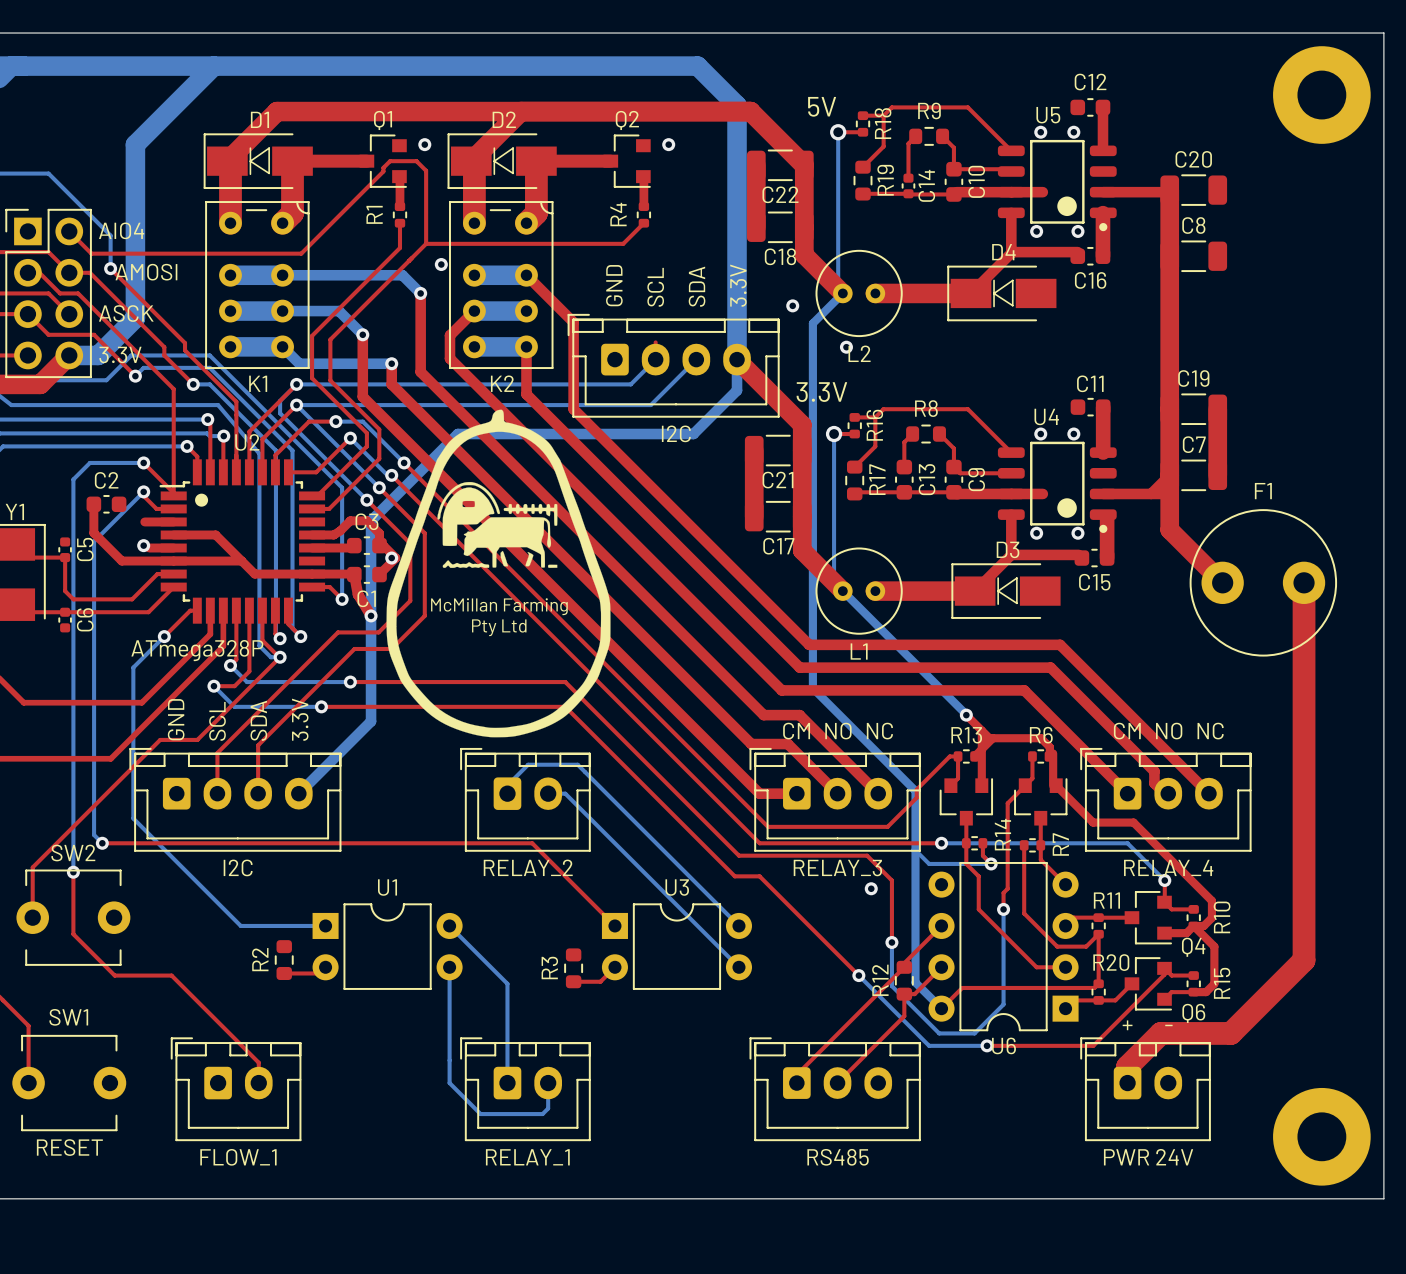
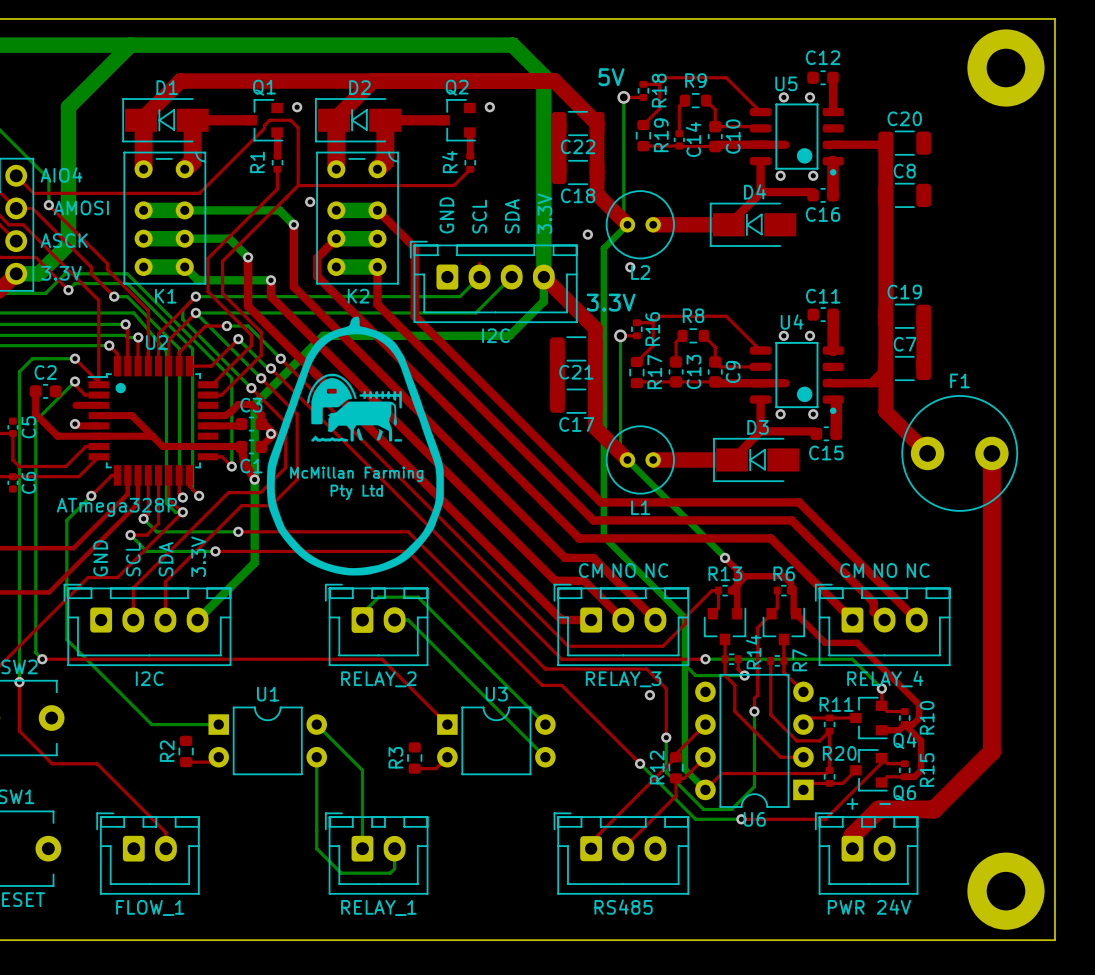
drawing shape: [386, 409, 611, 738] -> [266, 316, 444, 576]
text: McMillan Farming (499, 606) -> none
text: Pty Ltd (499, 627) -> none

